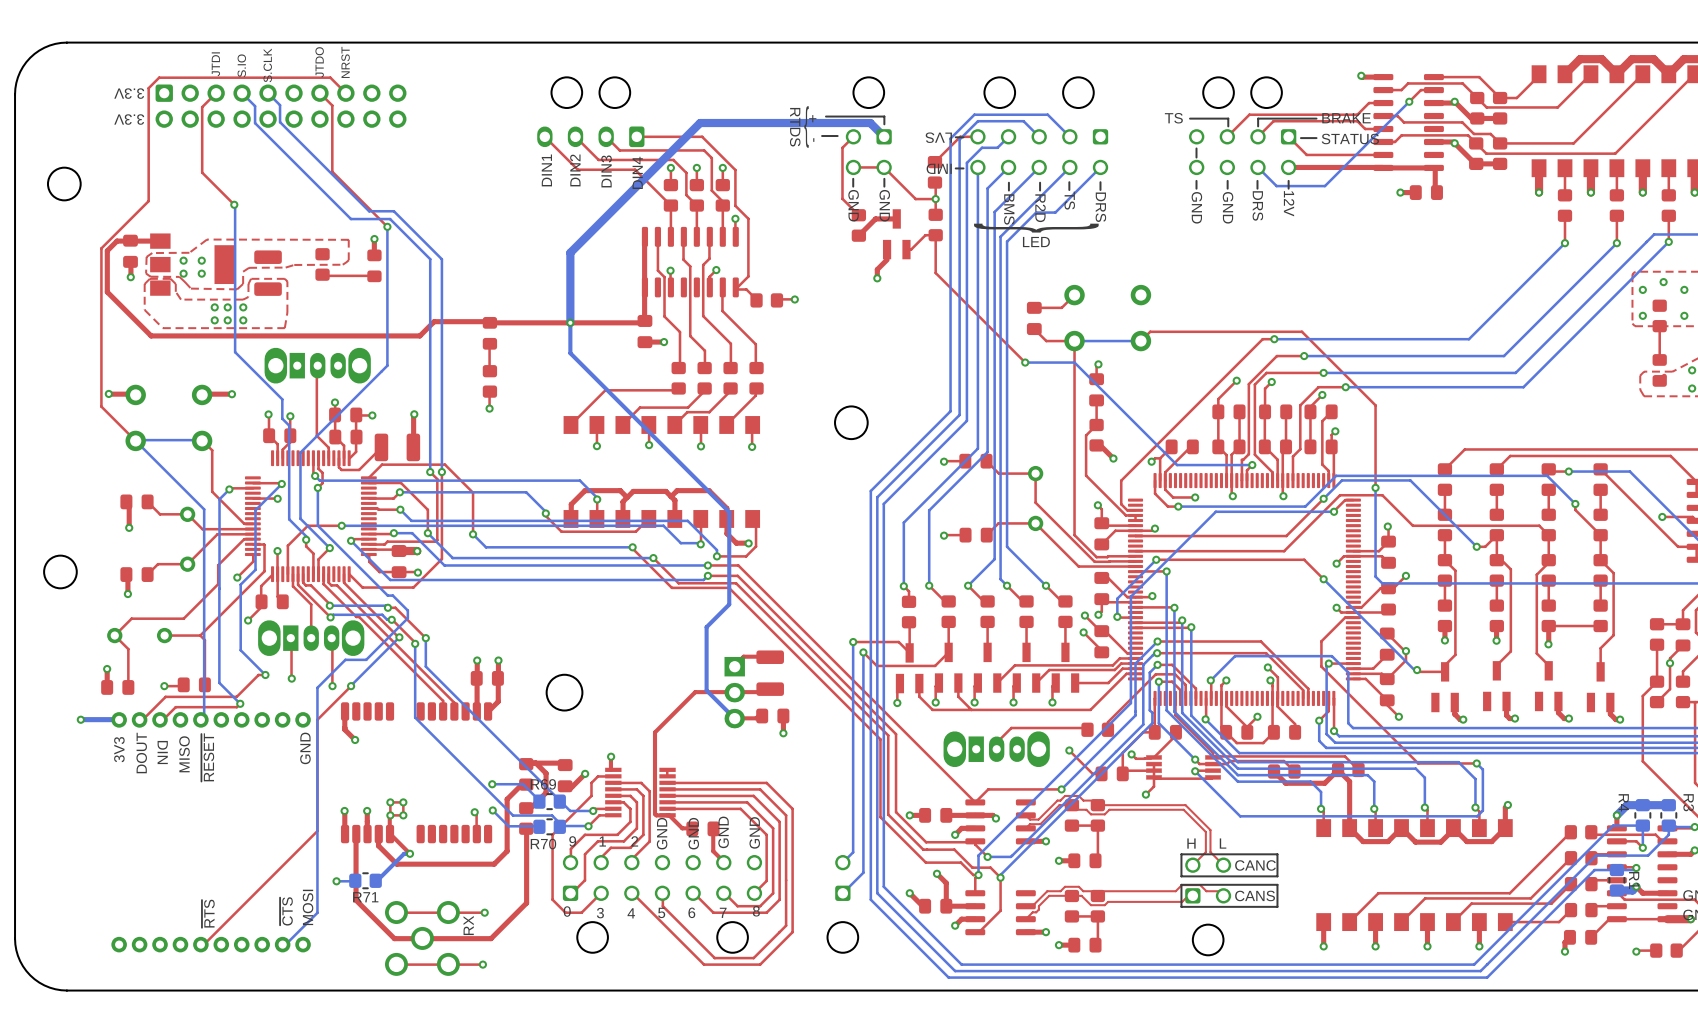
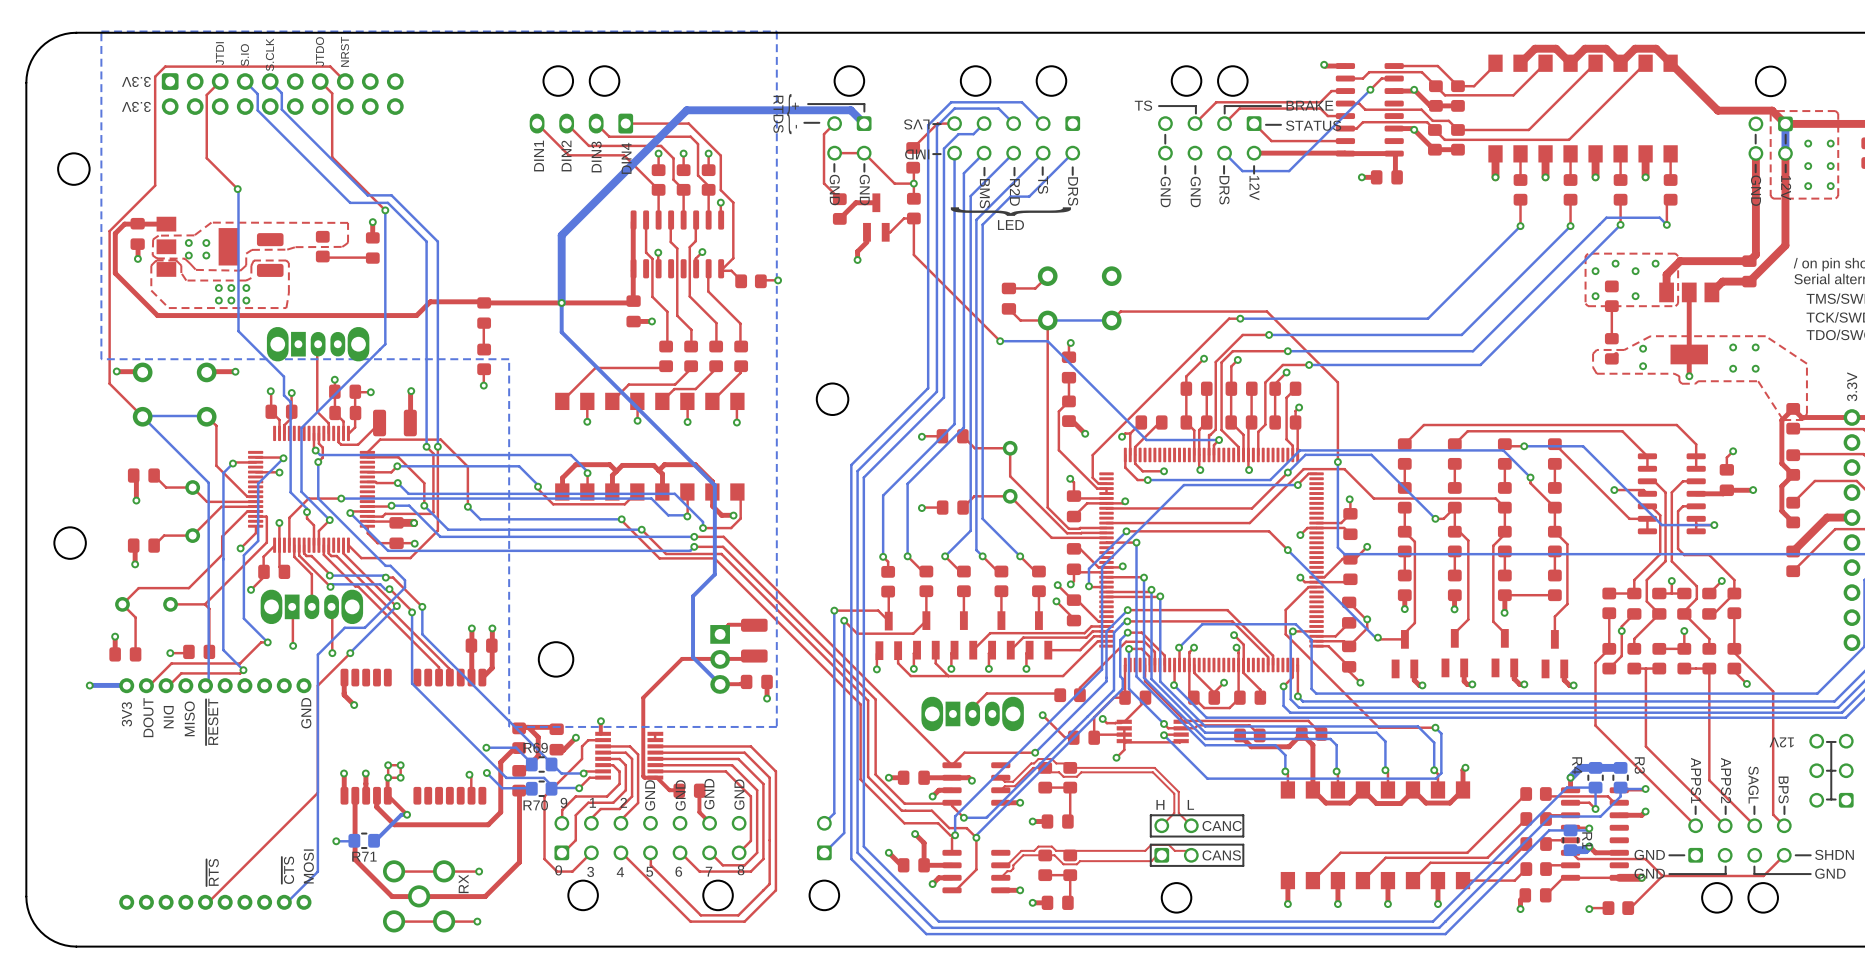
bottom zone outline: none -> (776, 31) (776, 726) (509, 726) (509, 359) (101, 359) (101, 31) (776, 31)

